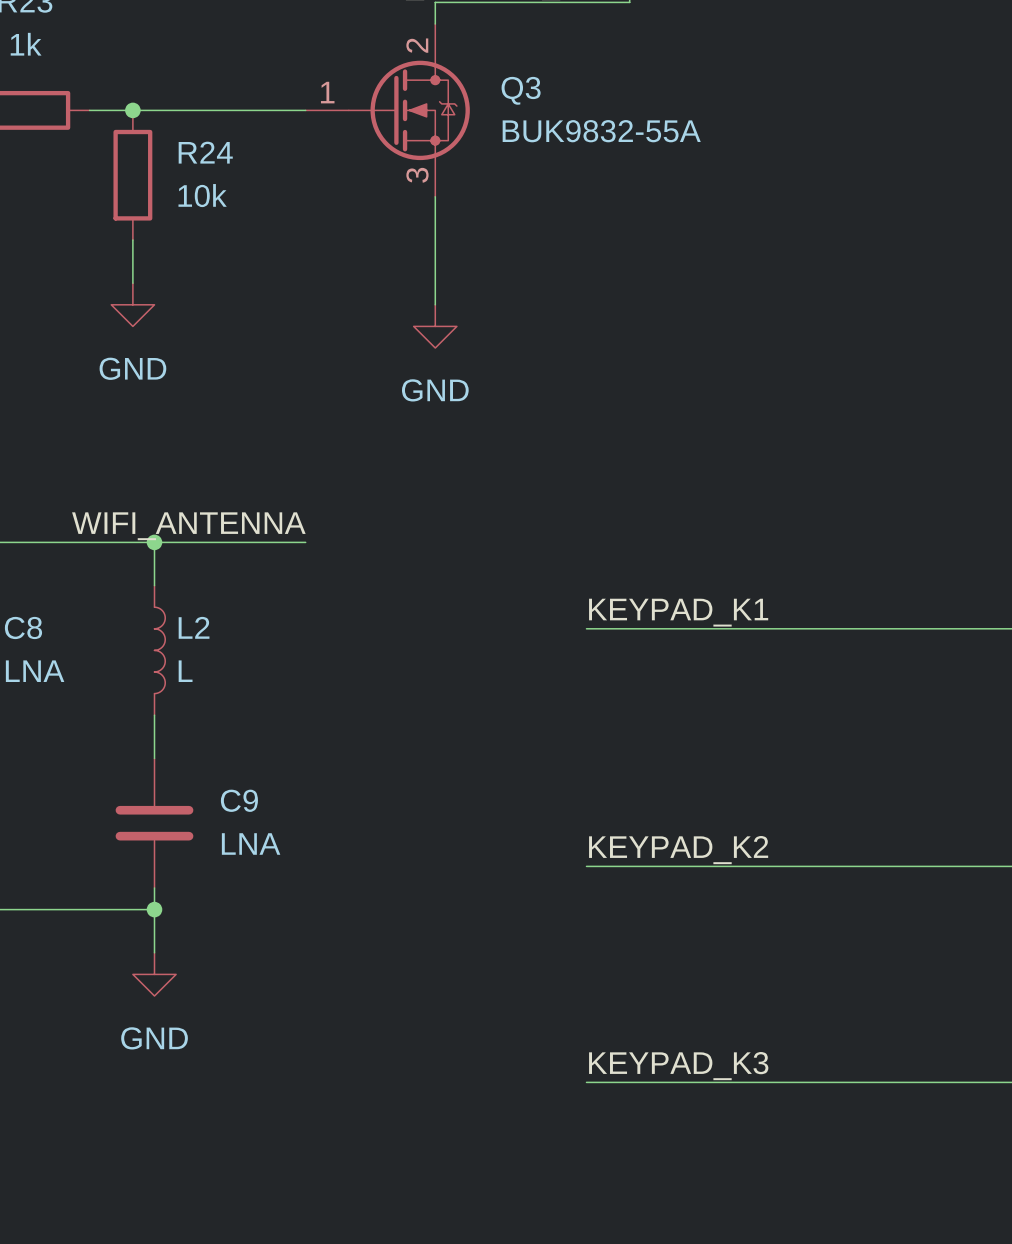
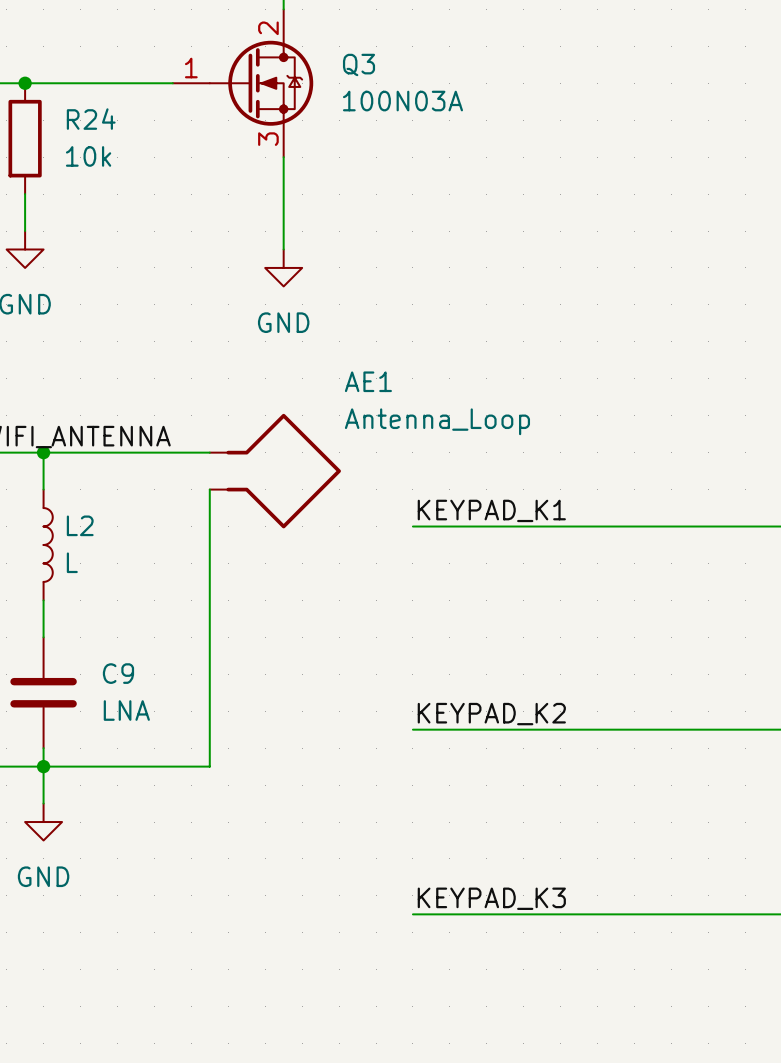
Q3 value: BUK9832-55A (601, 131) -> 100N03A (402, 101)
wire: none -> (172, 452) (209, 452)
AE1: none -> Antenna_Loop (275, 471)
wire: none -> (209, 489) (209, 766) (43, 766)

